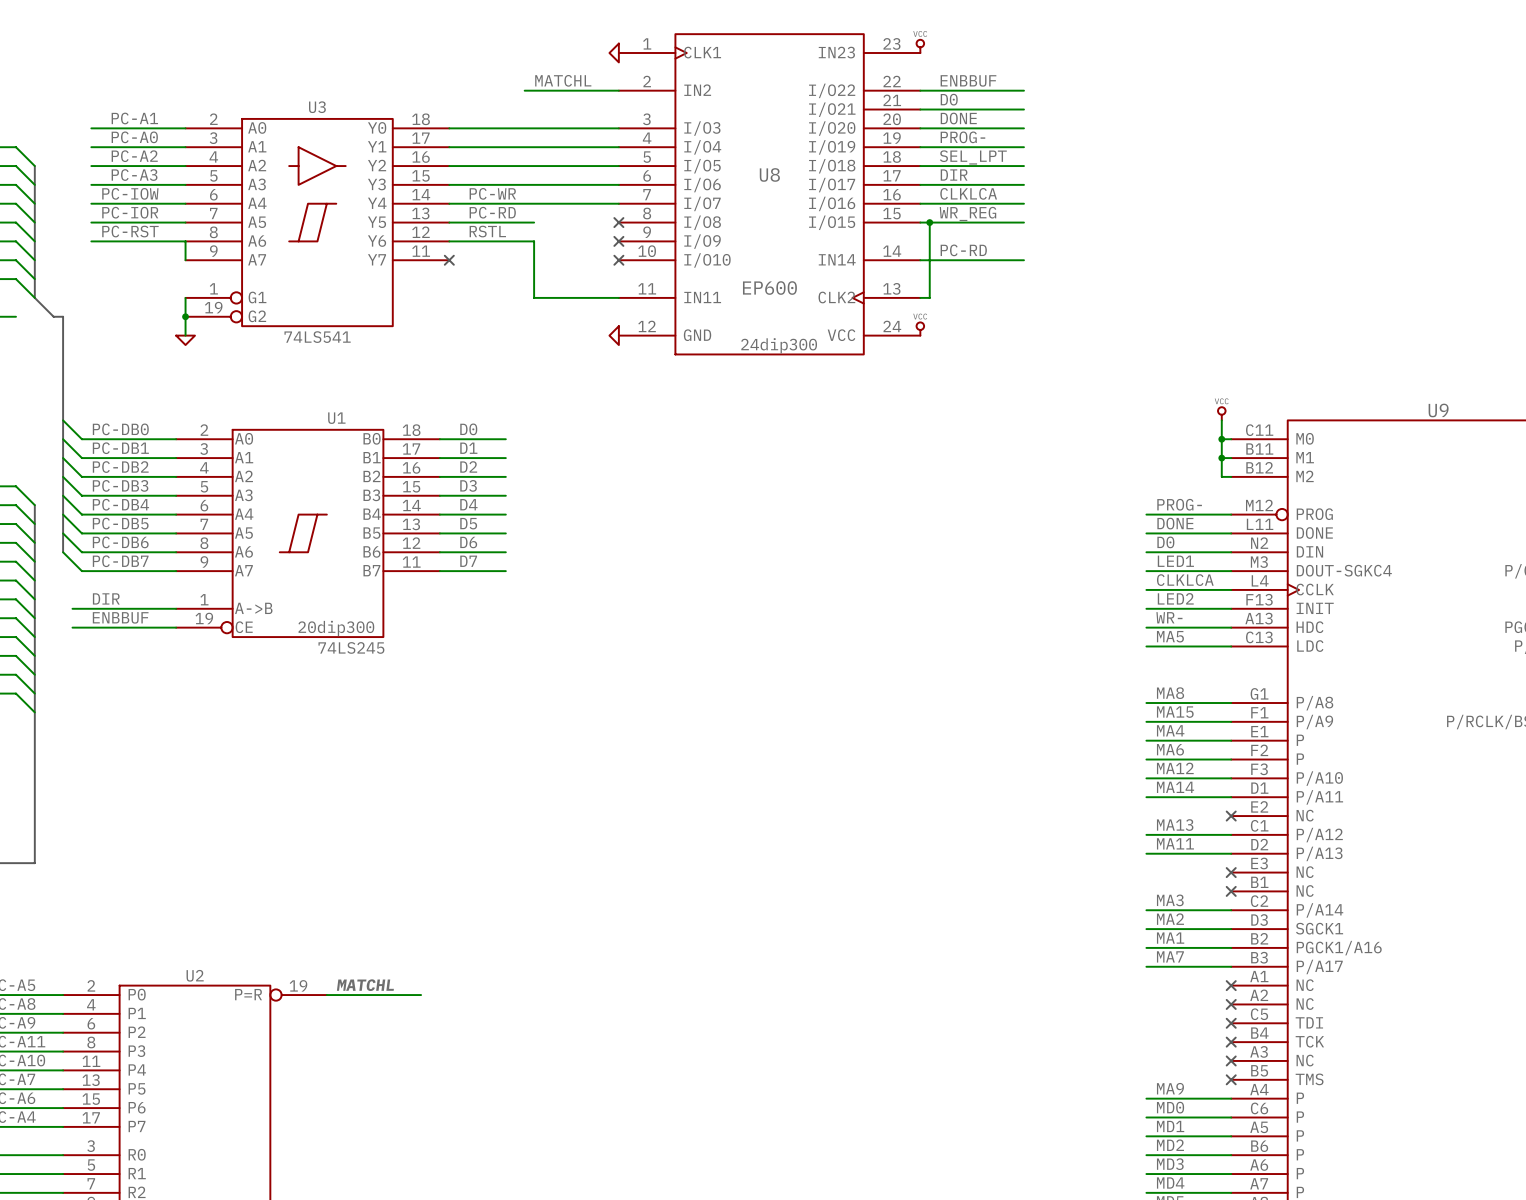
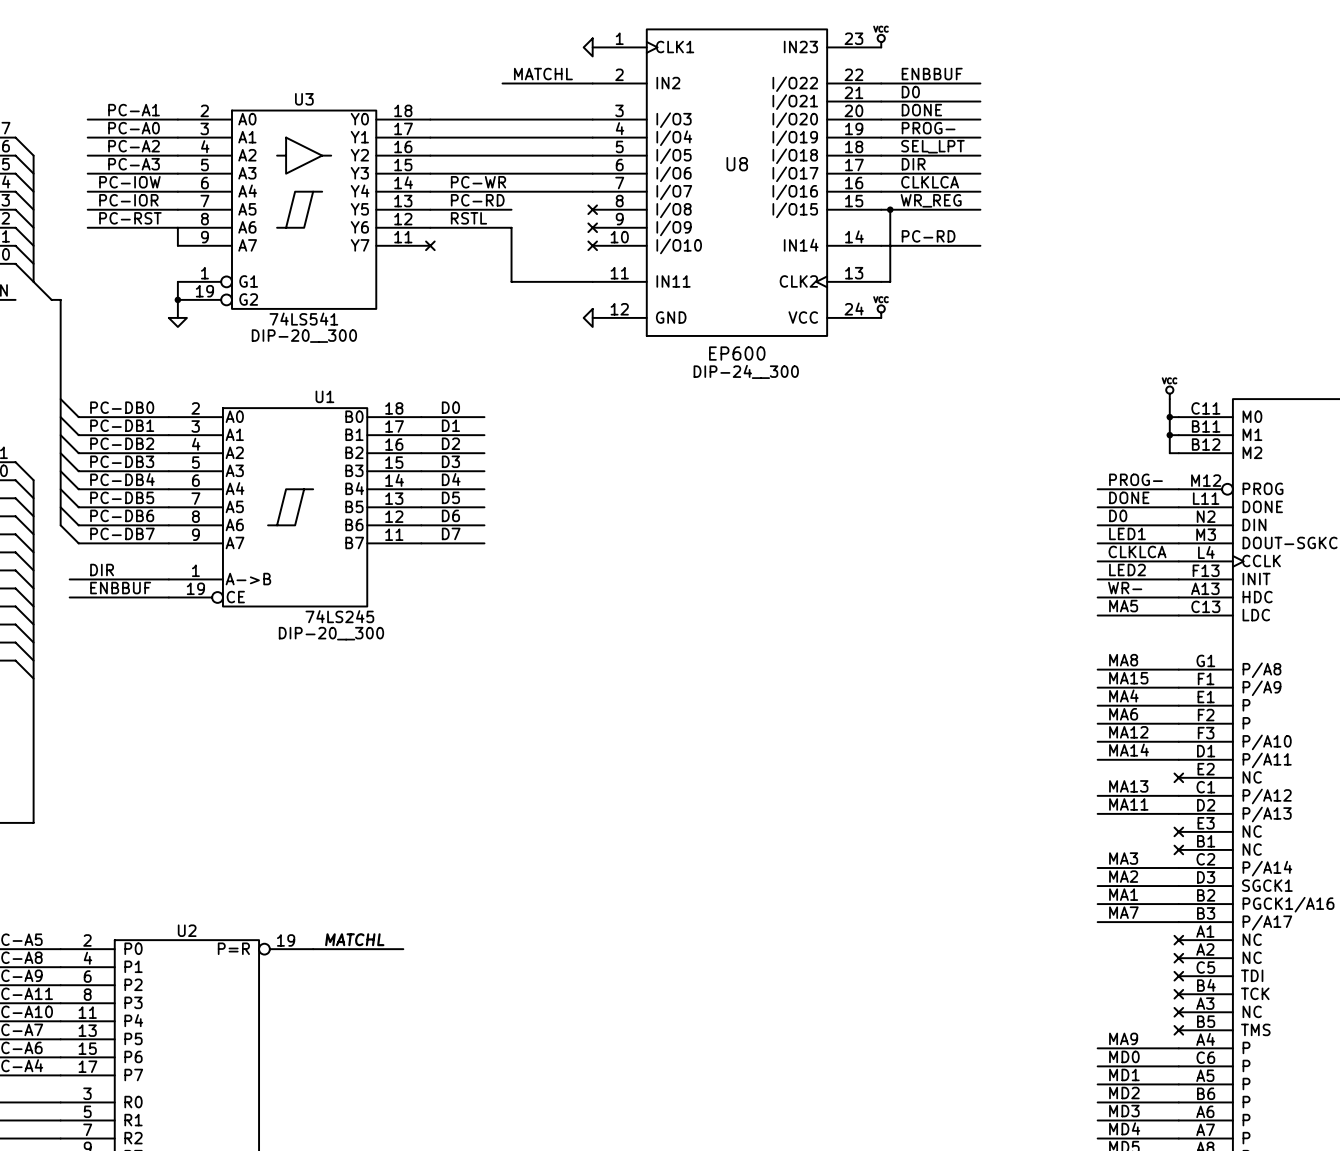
U8 value position: EP600 (769, 288) -> EP600 (737, 353)
U8 text: 24dip300 (779, 345) -> DIP-24__300 (746, 371)
U3 text: none -> DIP-20__300 (304, 336)
U1 text: 20dip300 (336, 628) -> DIP-20__300 (331, 633)

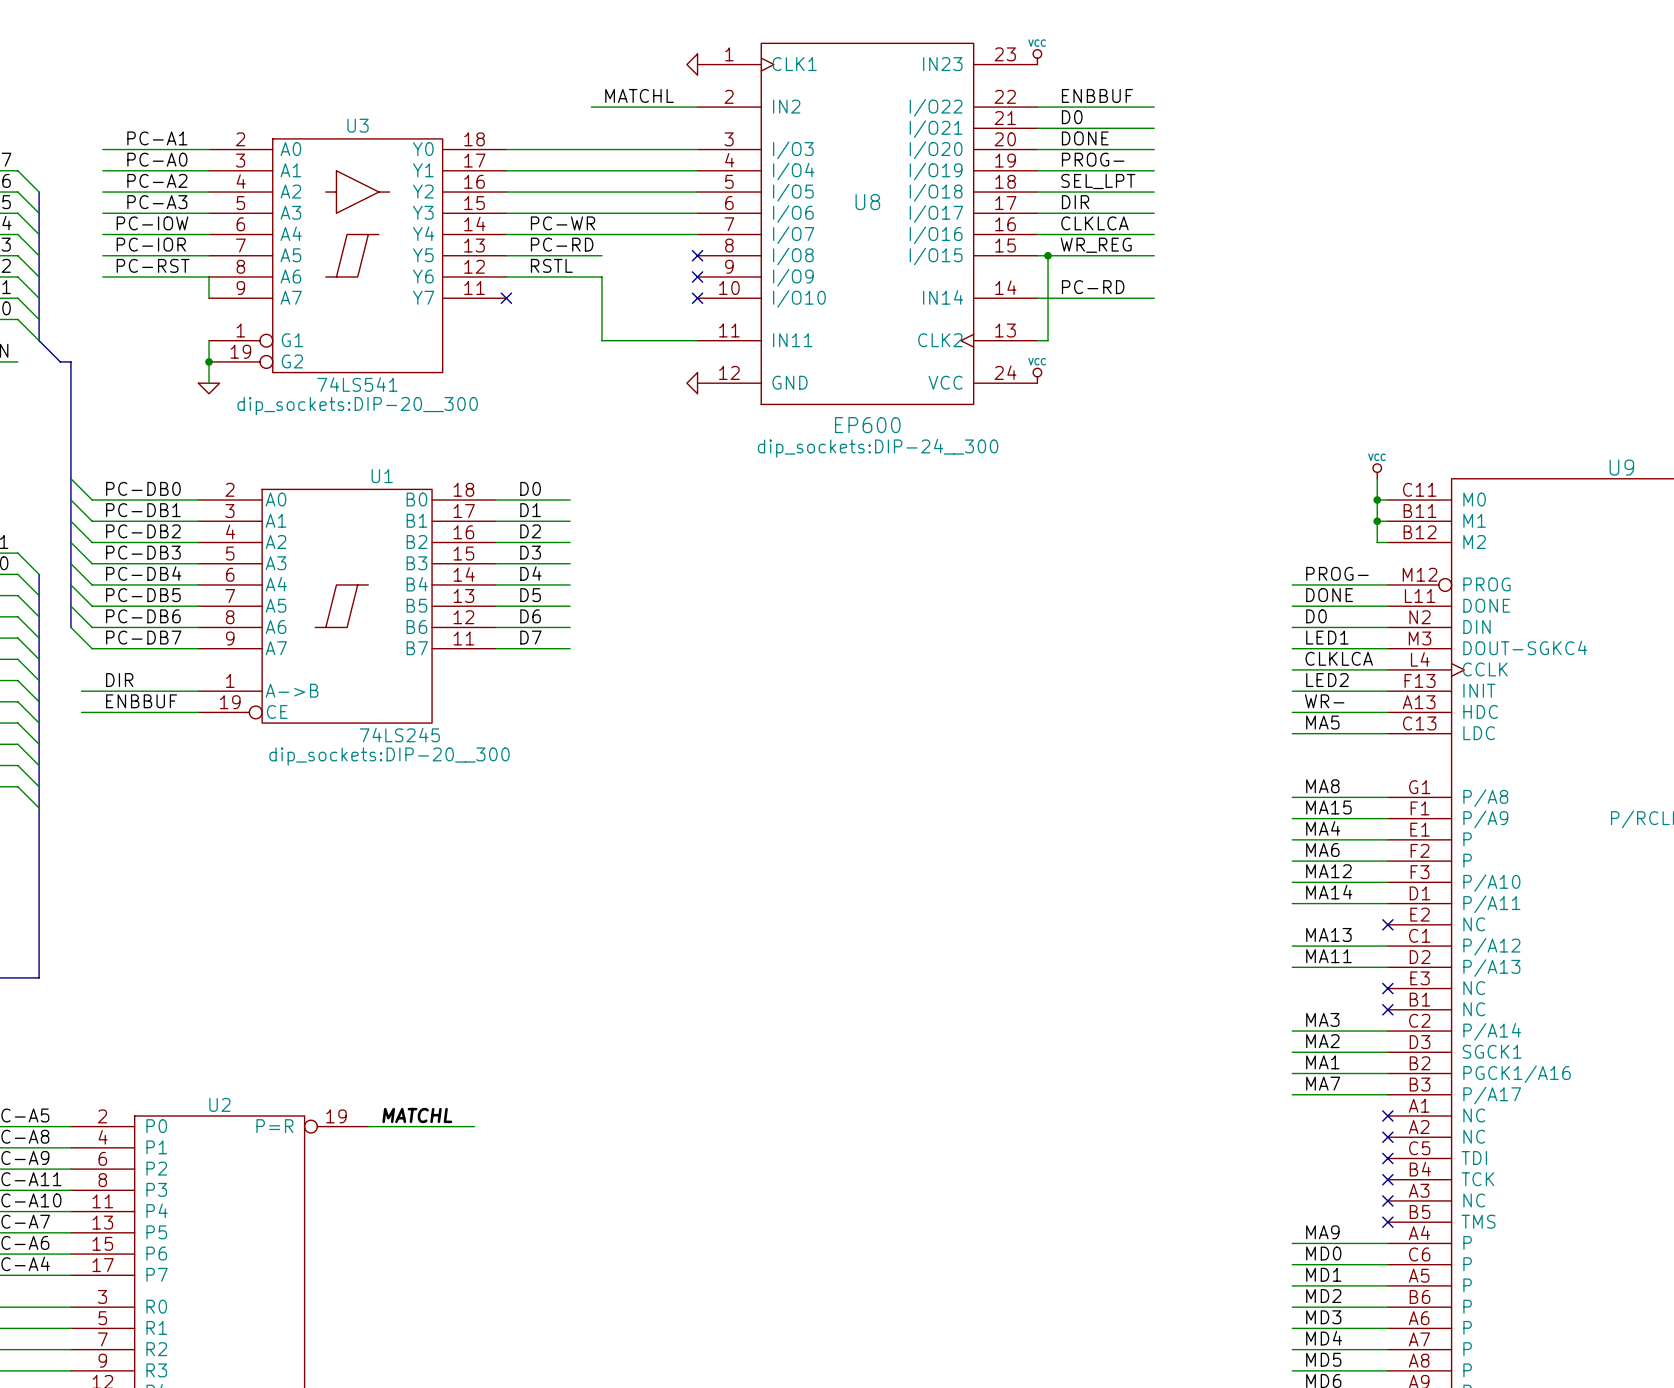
U3 text: DIP-20__300 (304, 336) -> dip_sockets:DIP-20__300 (357, 406)
U8 text: DIP-24__300 (746, 371) -> dip_sockets:DIP-24__300 (878, 448)
U1 text: DIP-20__300 (331, 633) -> dip_sockets:DIP-20__300 (389, 756)

